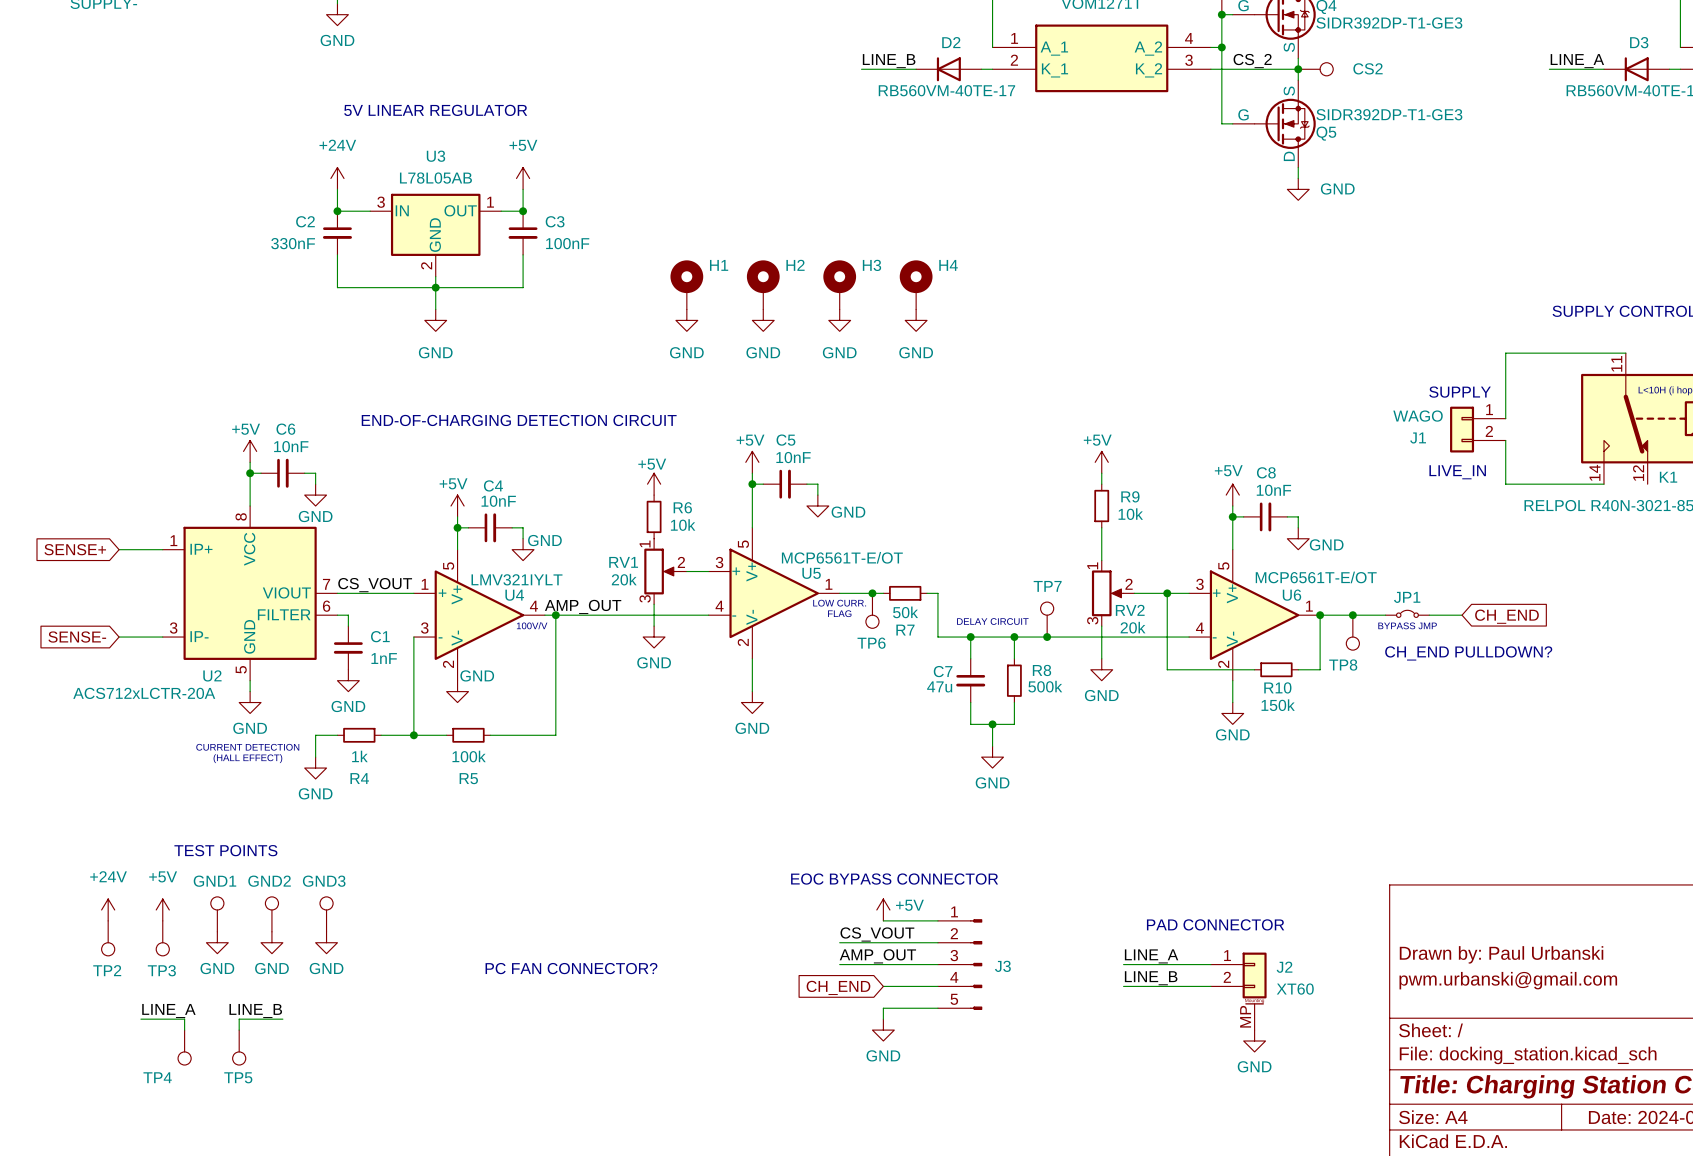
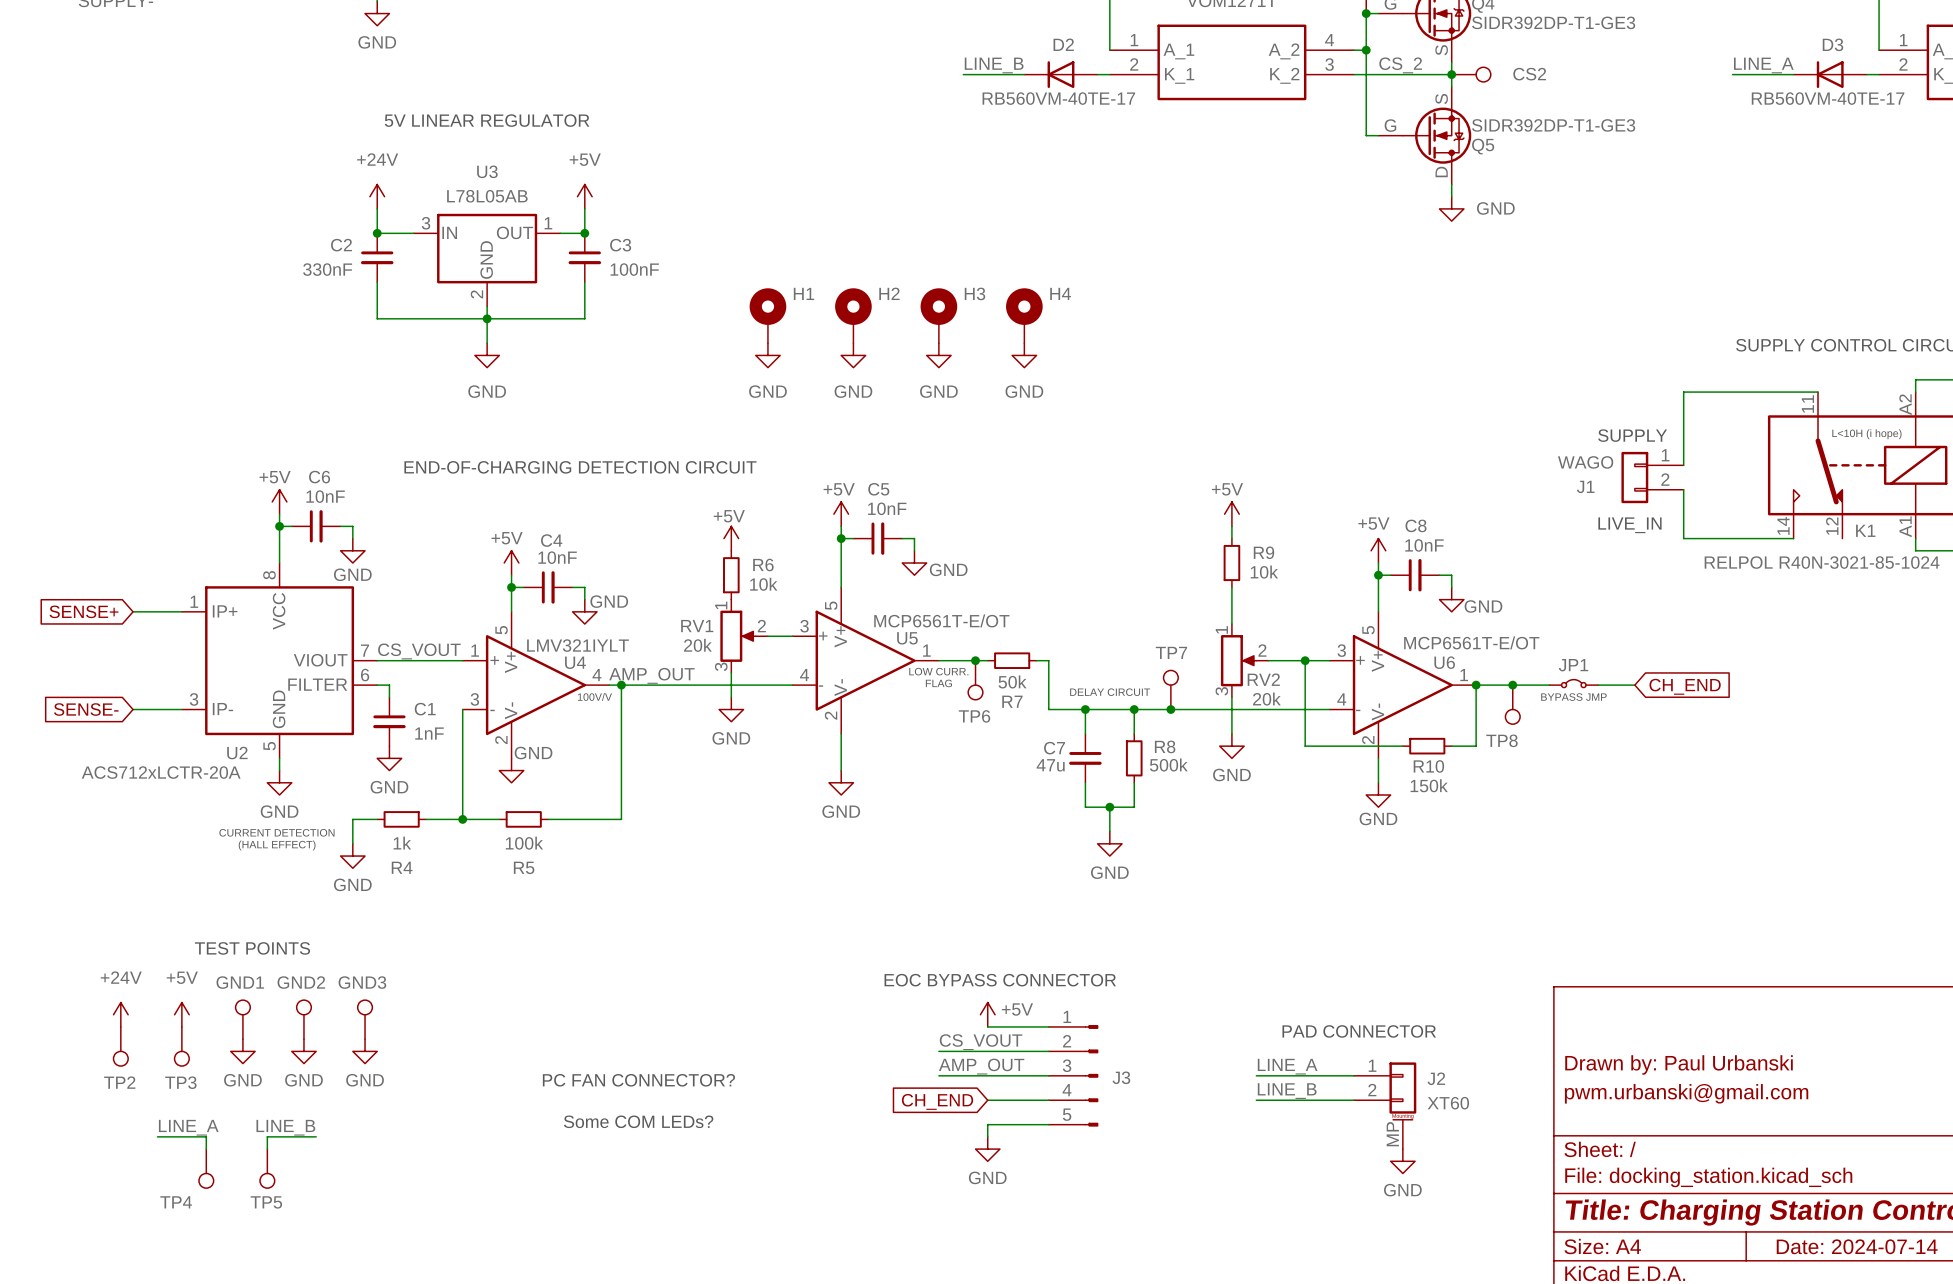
text: CH_END PULLDOWN? (1468, 653) -> none
text: none -> Some COM LEDs? (638, 1121)

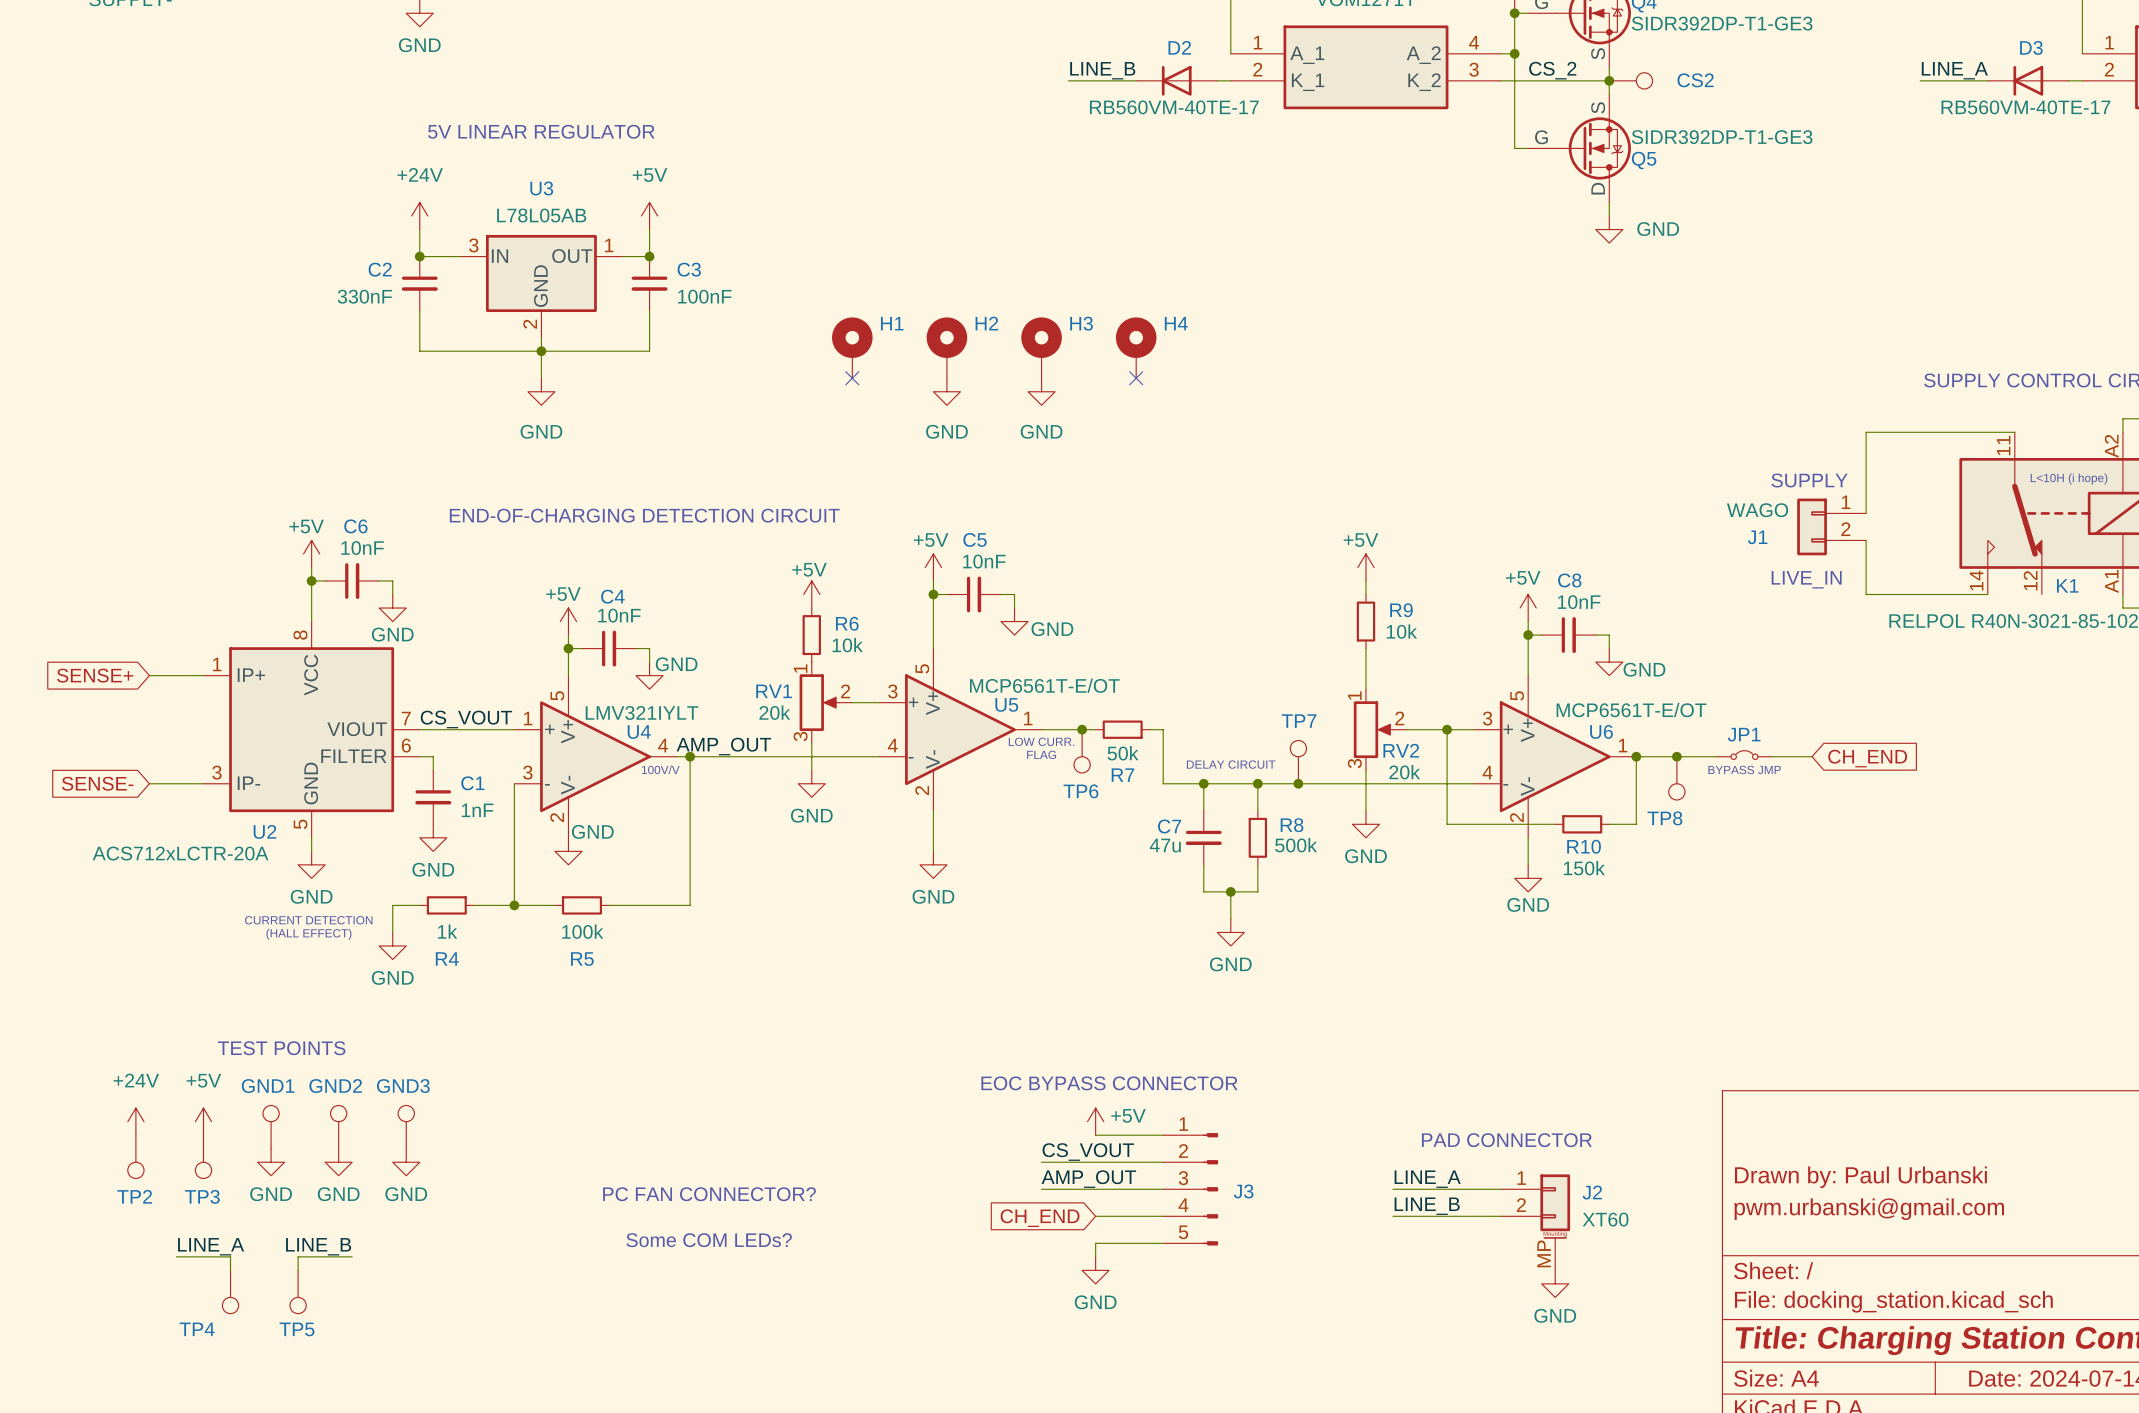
no-connect mark: none -> (852, 378)
no-connect mark: none -> (1136, 378)
power symbol: GND (767, 355) -> none
power symbol: GND (1024, 355) -> none

